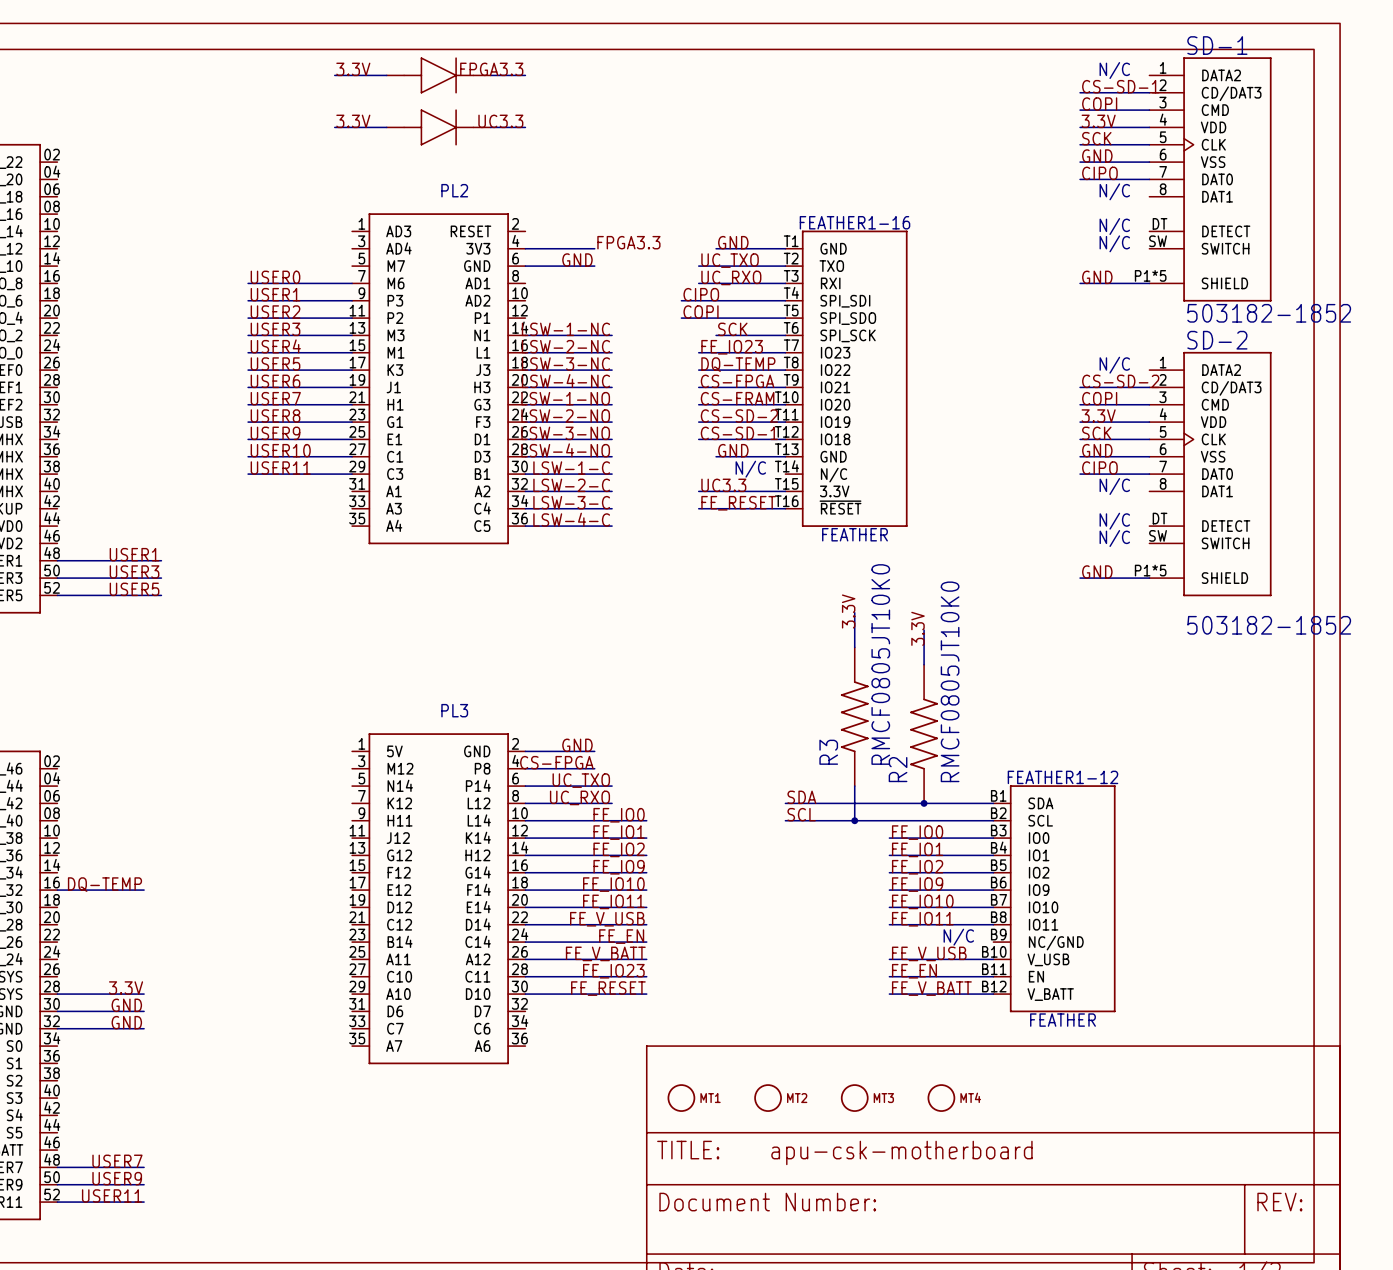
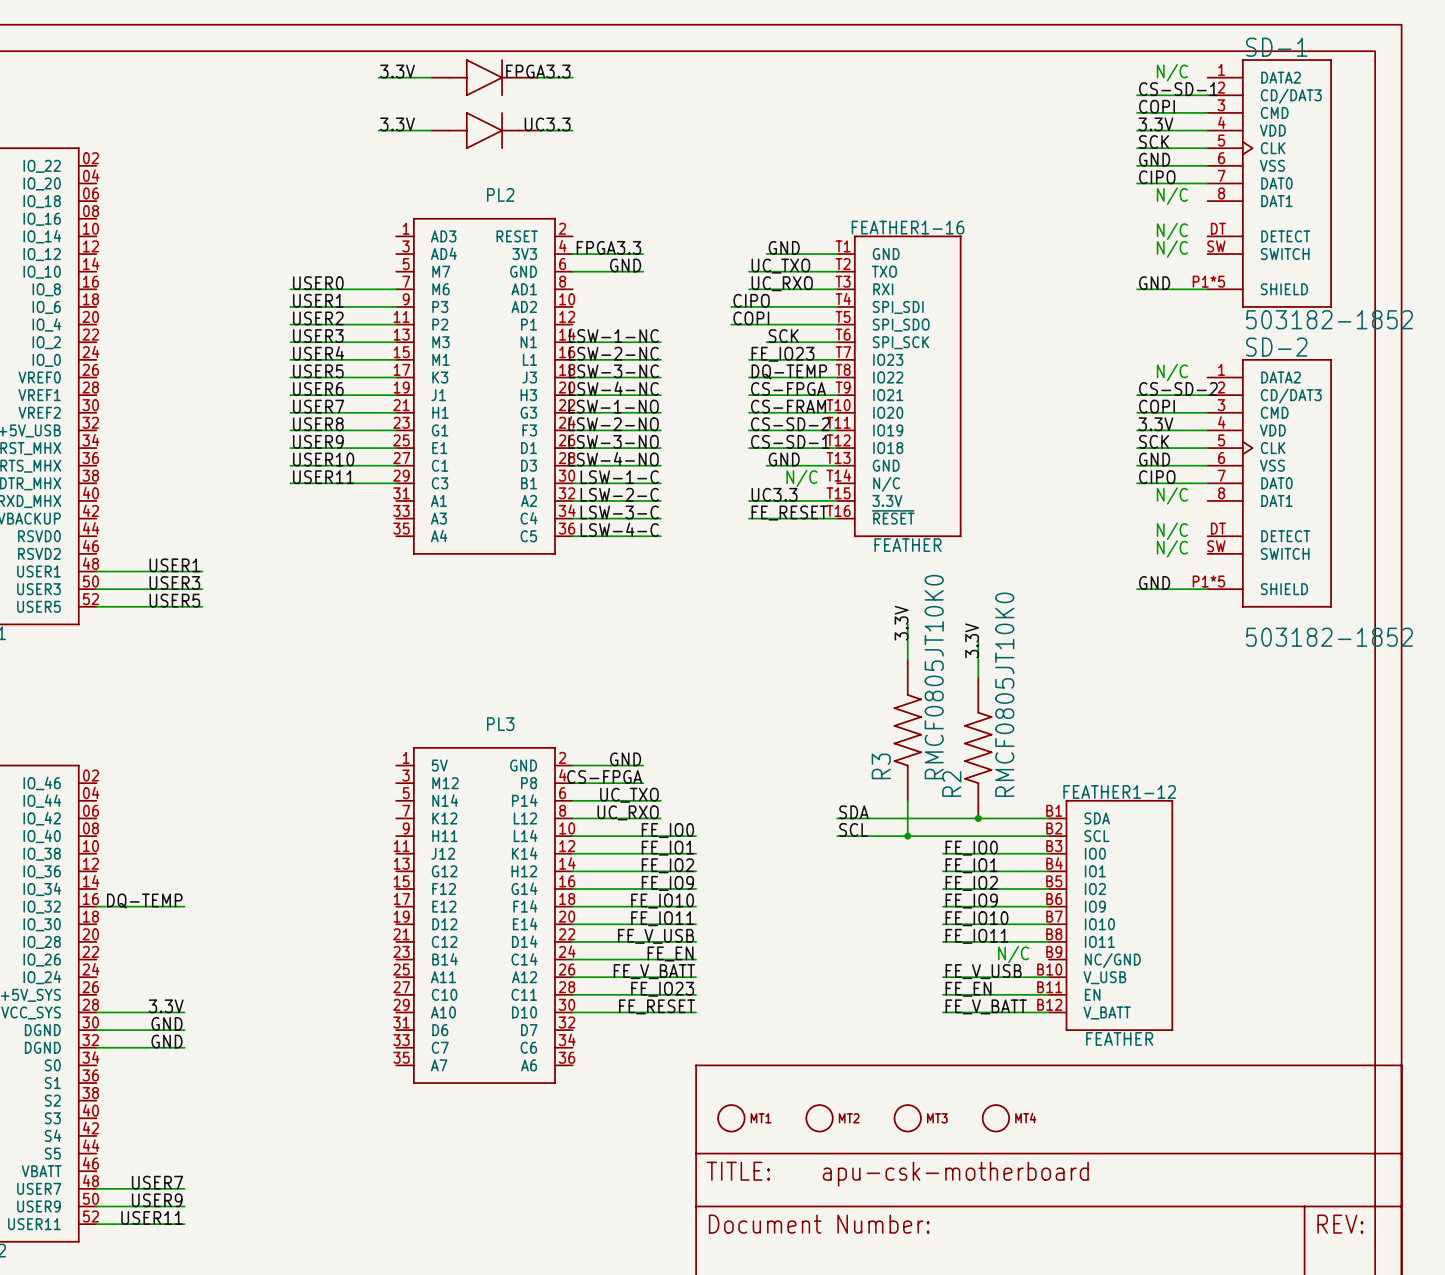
label position: FPGA3.3 (628, 242) -> FPGA3.3 (608, 247)

